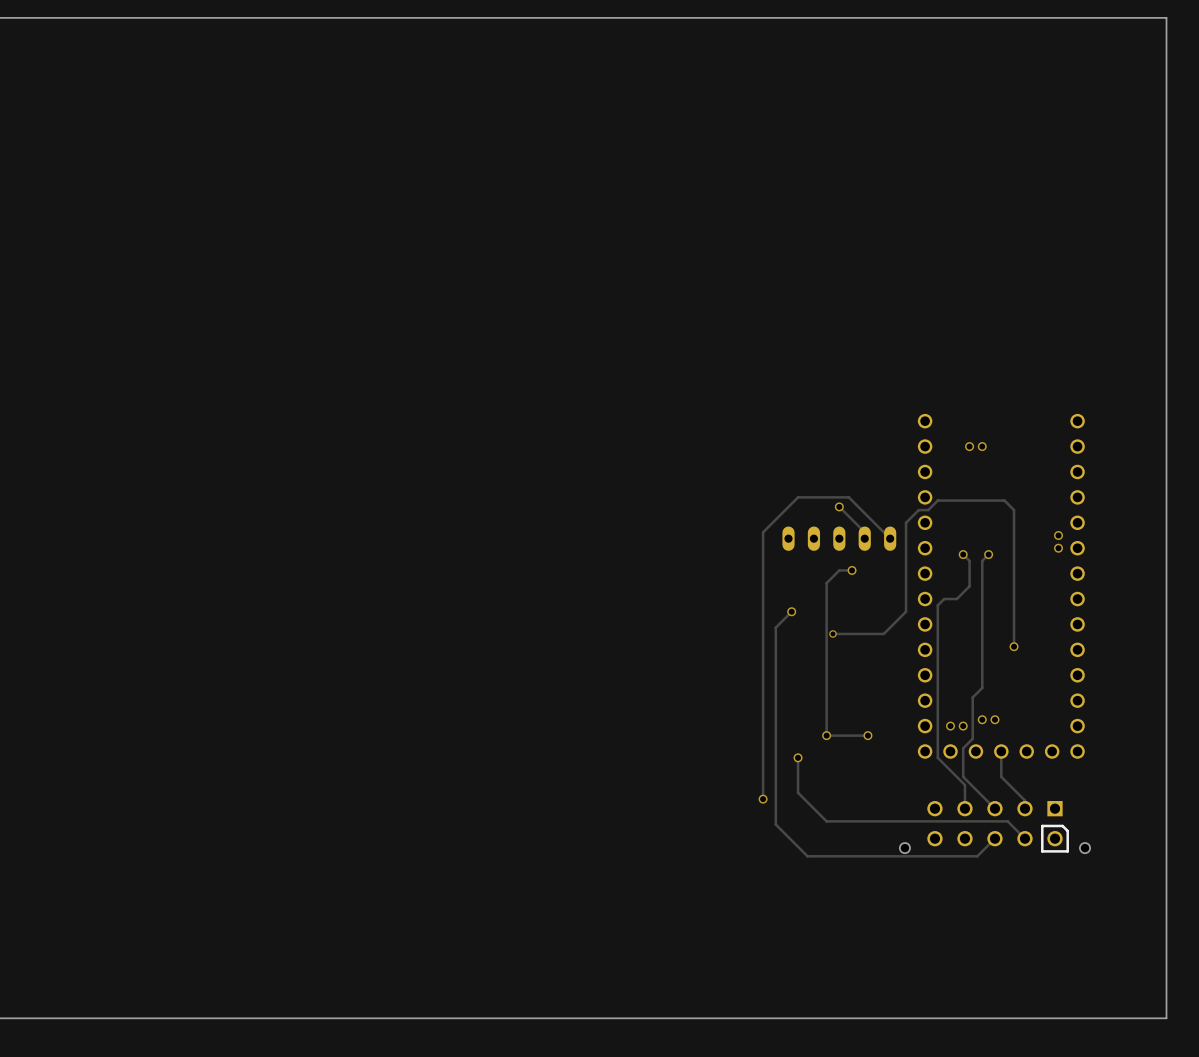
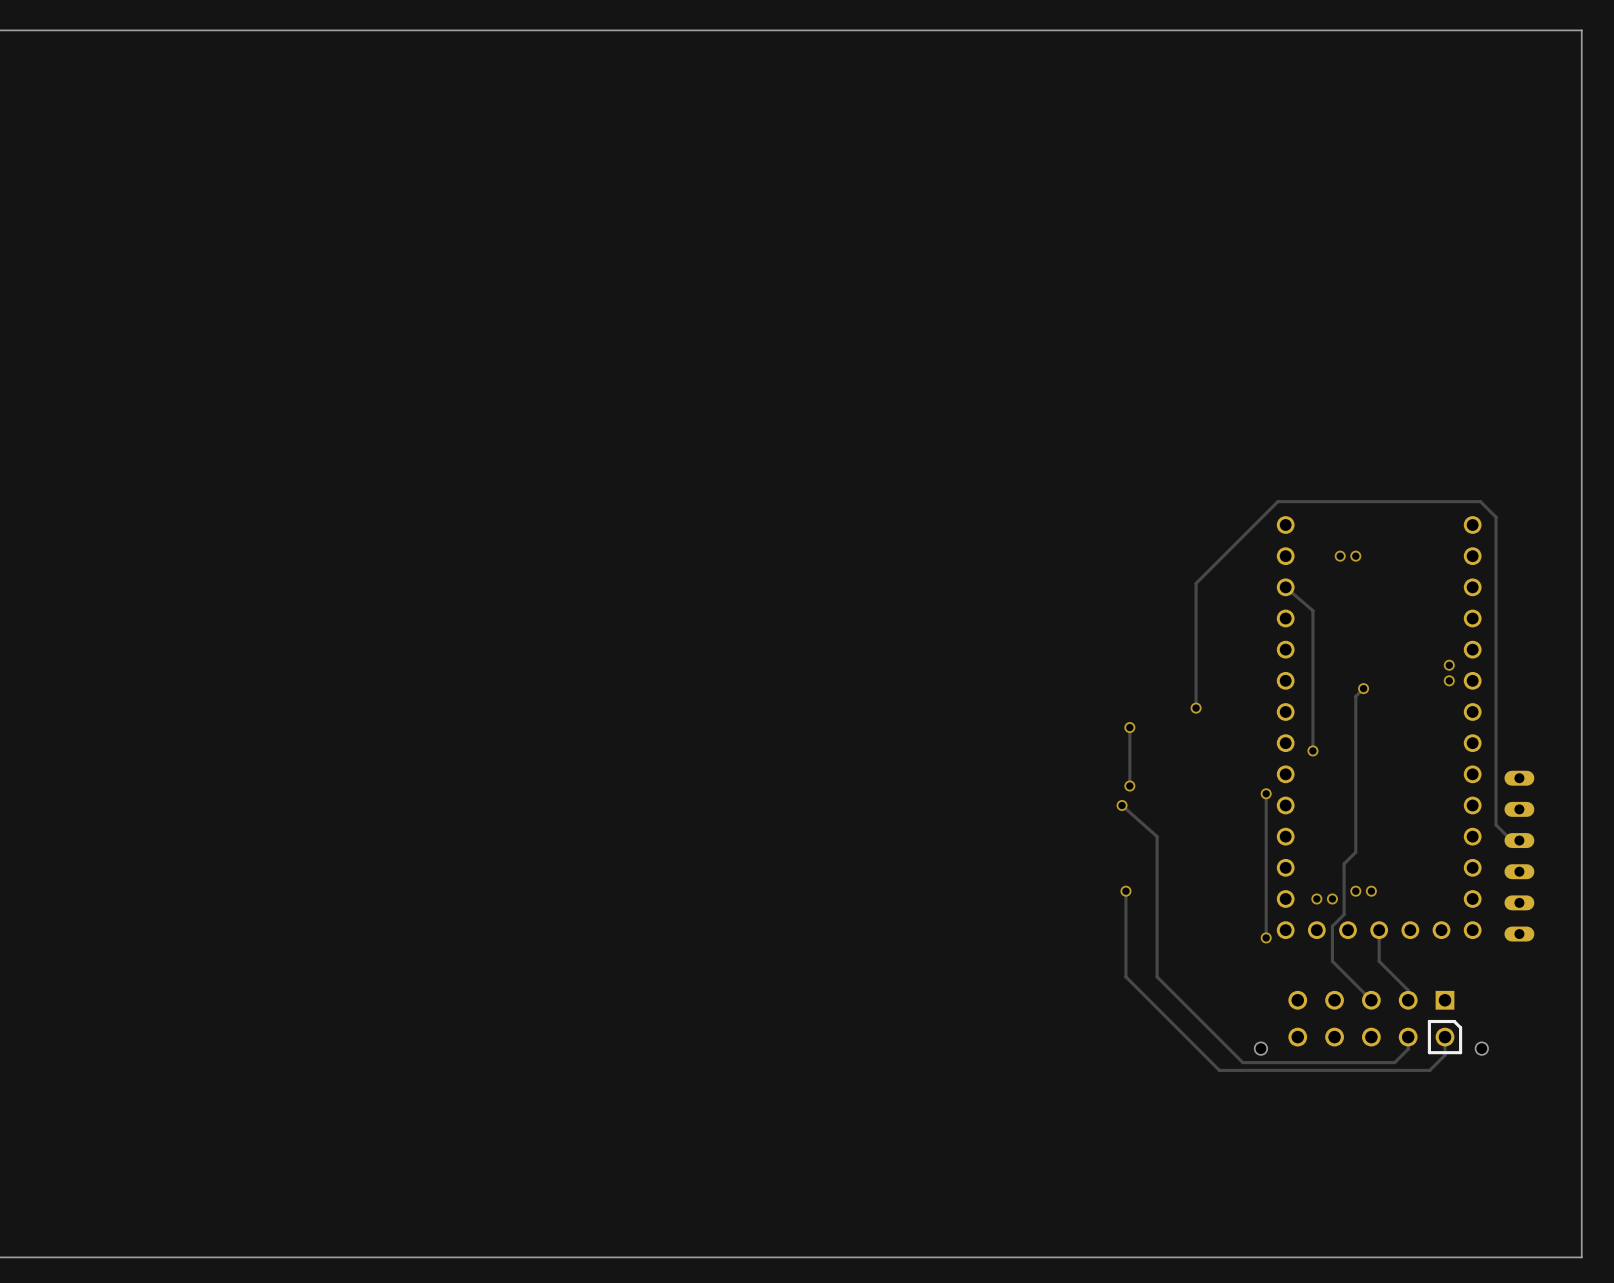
track: none -> (1285, 587) (1312, 610) (1312, 750)
track: (839, 506) (864, 532) (864, 538) -> none
via: (839, 506) -> none
part: (839, 538) -> none
track: (890, 538) (848, 497) (798, 497) (763, 532) (763, 799) -> none
track: (963, 554) (969, 560) (969, 586) (956, 599) (944, 599) (937, 605) (937, 757) (964, 785) (964, 808) -> none
via: (963, 554) -> none
track: (852, 570) (839, 570) (826, 583) (826, 735) (867, 735) -> none
track: none -> (1196, 711) (1196, 583) (1277, 501) (1480, 501) (1496, 517) (1496, 824) (1511, 840) (1519, 840)
track: none -> (1129, 727) (1129, 786)
via: none -> (1129, 727)
via: none -> (1312, 750)
track: (791, 611) (775, 627) (775, 824) (807, 856) (977, 856) (994, 838) -> none
via: (791, 611) -> none
via: none -> (1129, 786)
track: (832, 633) (883, 633) (906, 611) (906, 522) (918, 510) (928, 510) (937, 500) (1004, 500) (1014, 510) (1014, 646) -> none
via: (832, 633) -> none
track: none -> (1266, 793) (1266, 937)
via: none -> (1266, 793)
via: (1014, 646) -> none
track: none -> (1122, 805) (1157, 836) (1157, 976) (1242, 1062) (1394, 1062) (1408, 1049) (1408, 1037)
via: none -> (1122, 805)
part: none -> (1519, 856)
via: none -> (1125, 891)
via: (826, 735) -> none
via: (867, 735) -> none
track: (798, 757) (798, 792) -> (1125, 891) (1125, 976) (1129, 980)
via: (798, 757) -> none
via: none -> (1266, 937)
via: (763, 799) -> none
track: (826, 821) (1007, 821) (1024, 838) -> (1164, 1015) (1219, 1070) (1429, 1070) (1445, 1055) (1445, 1037)

